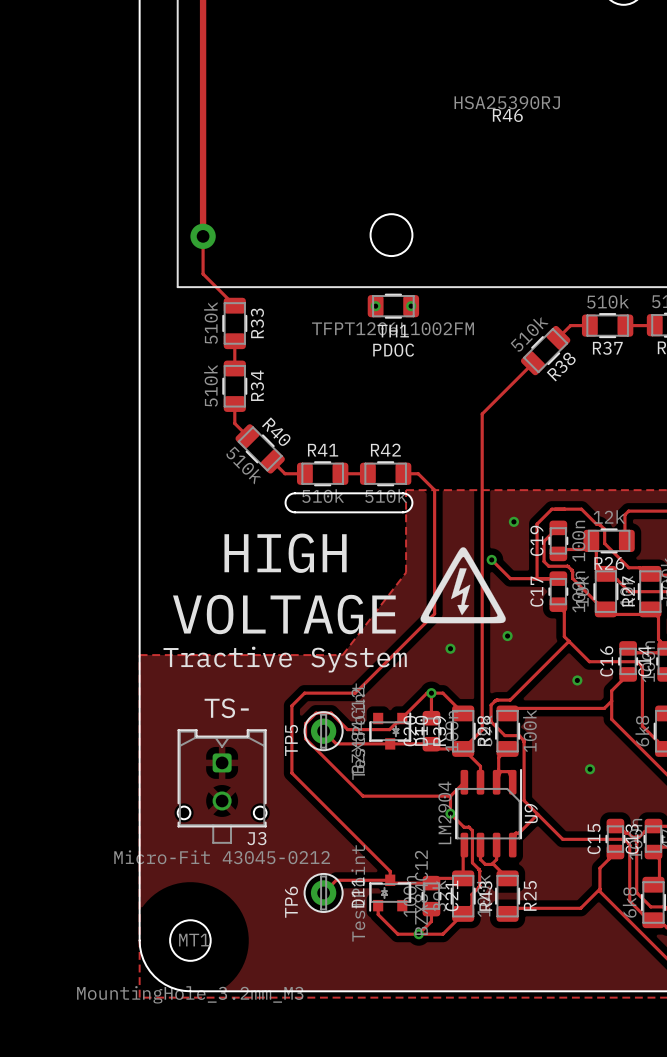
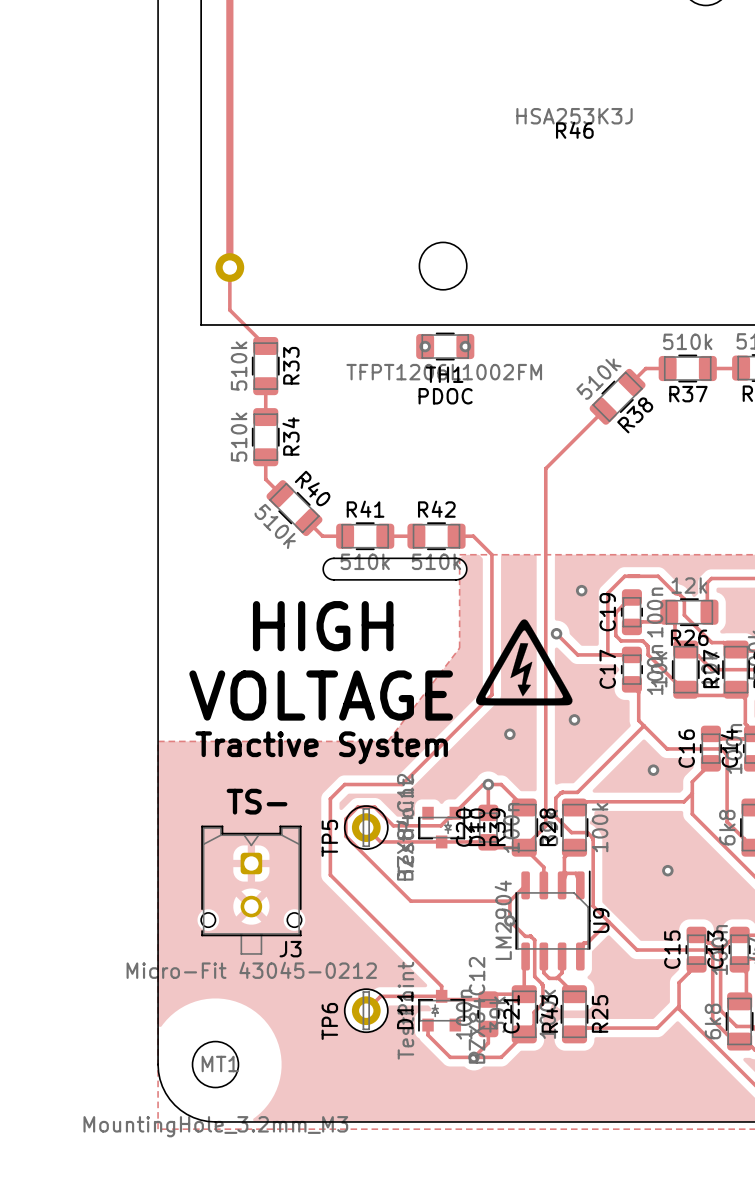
R46 value: HSA25390RJ (507, 102) -> HSA253K3J (574, 116)

